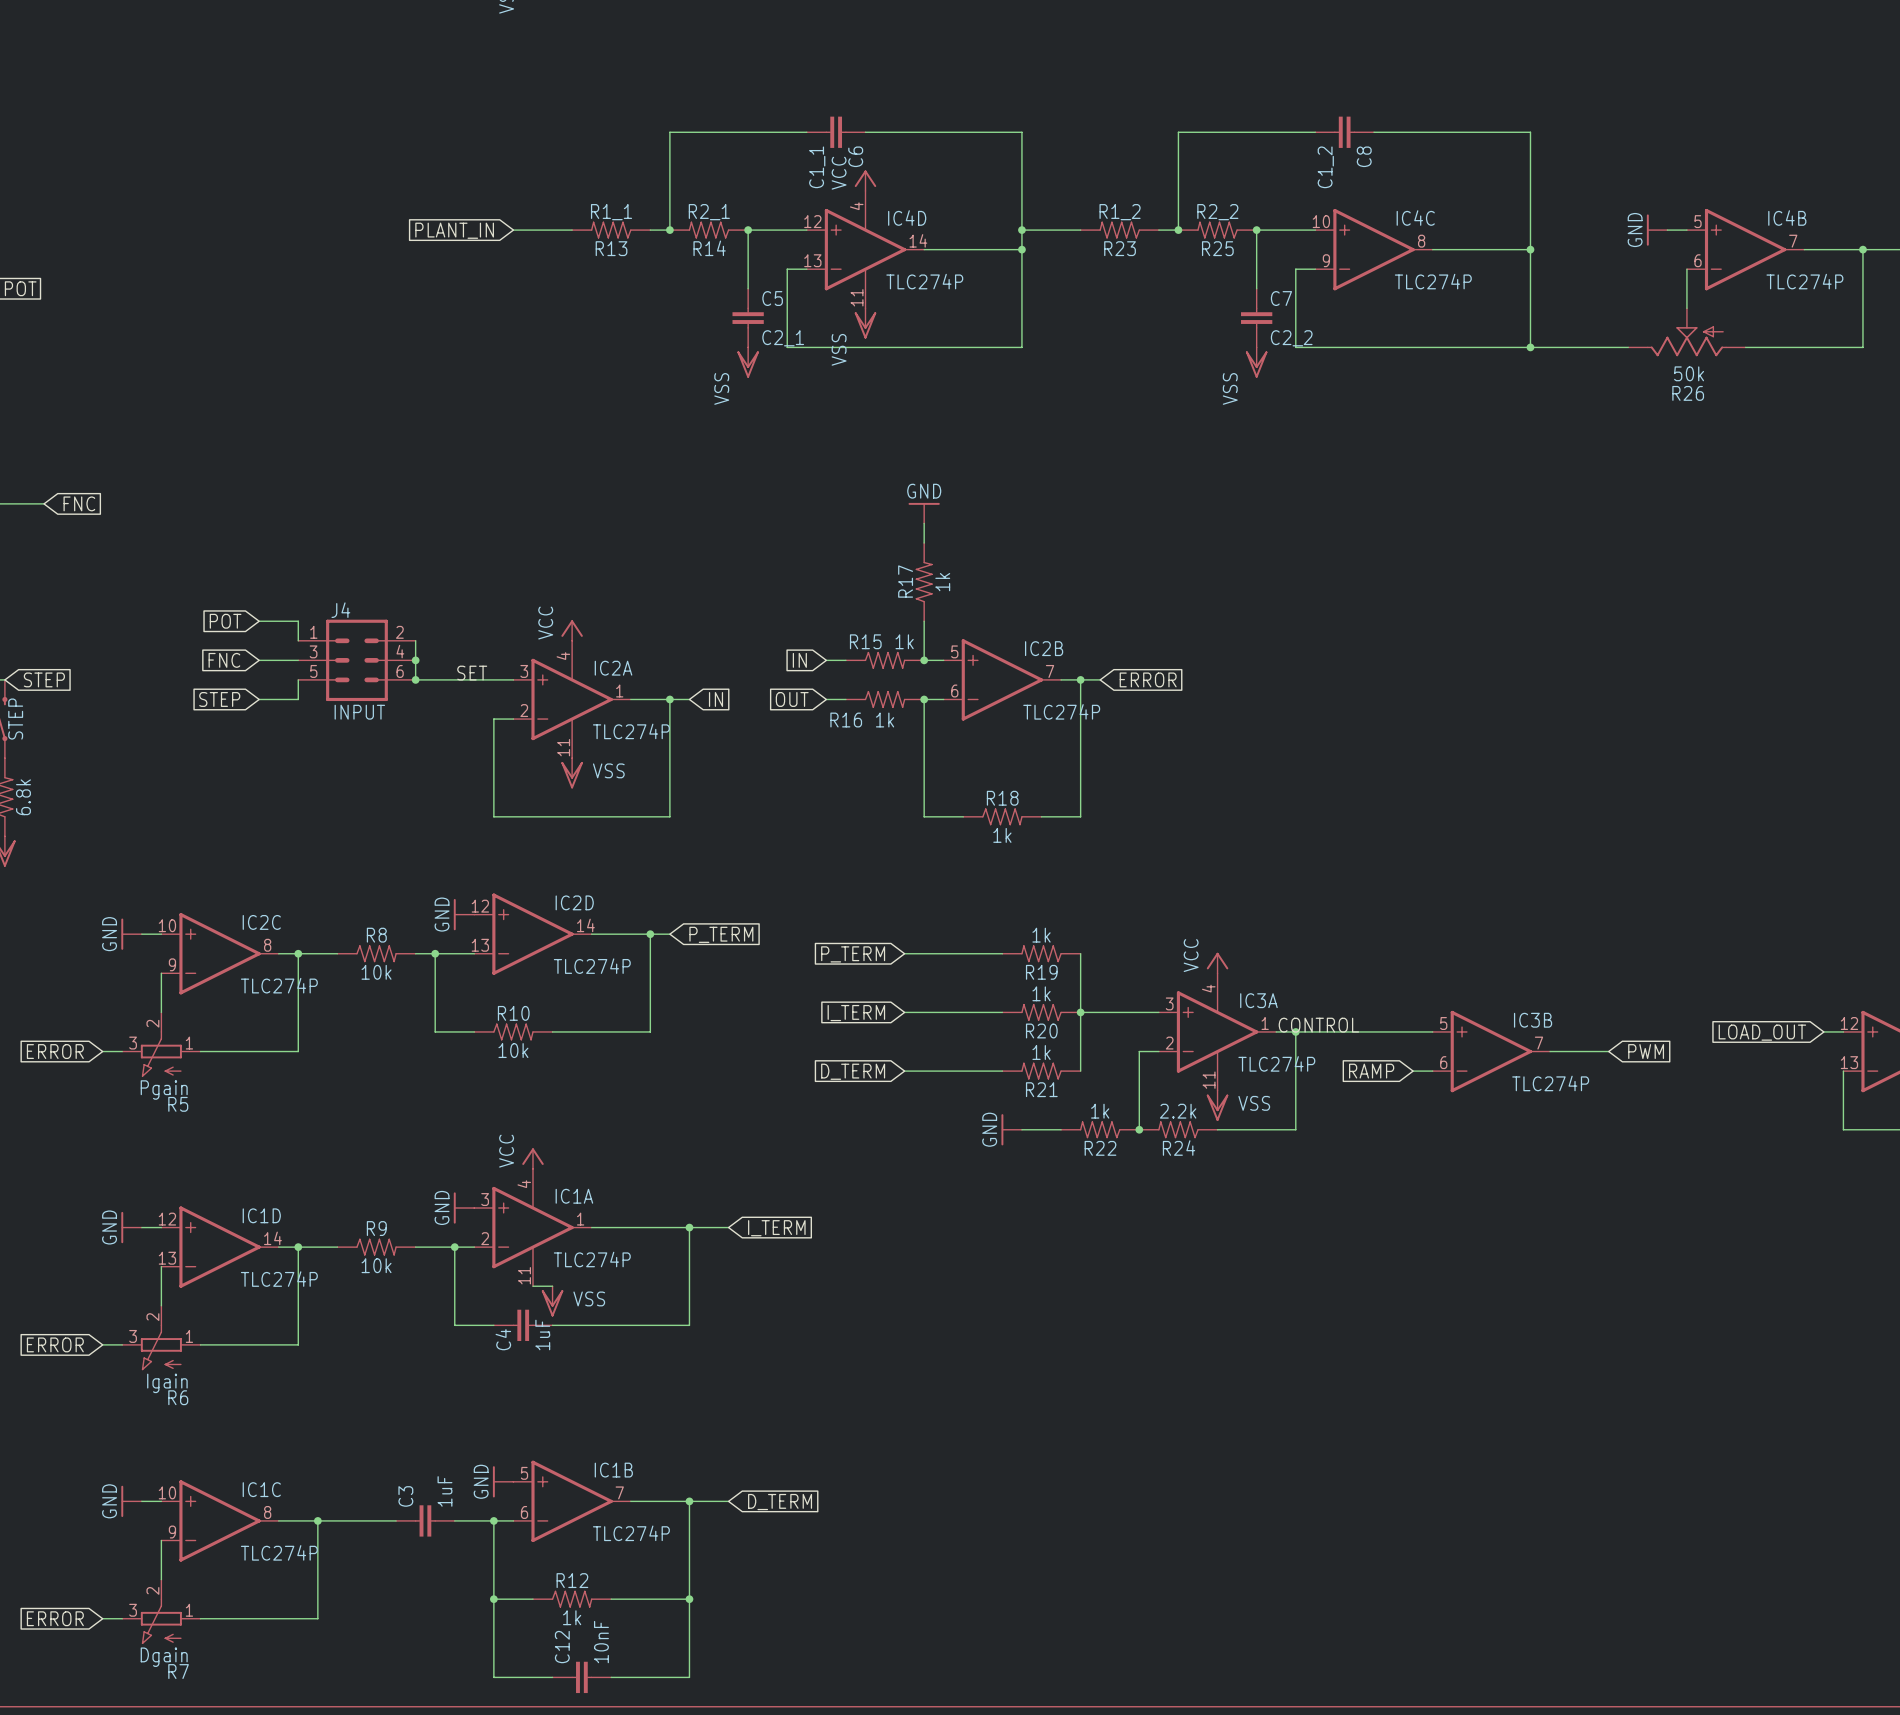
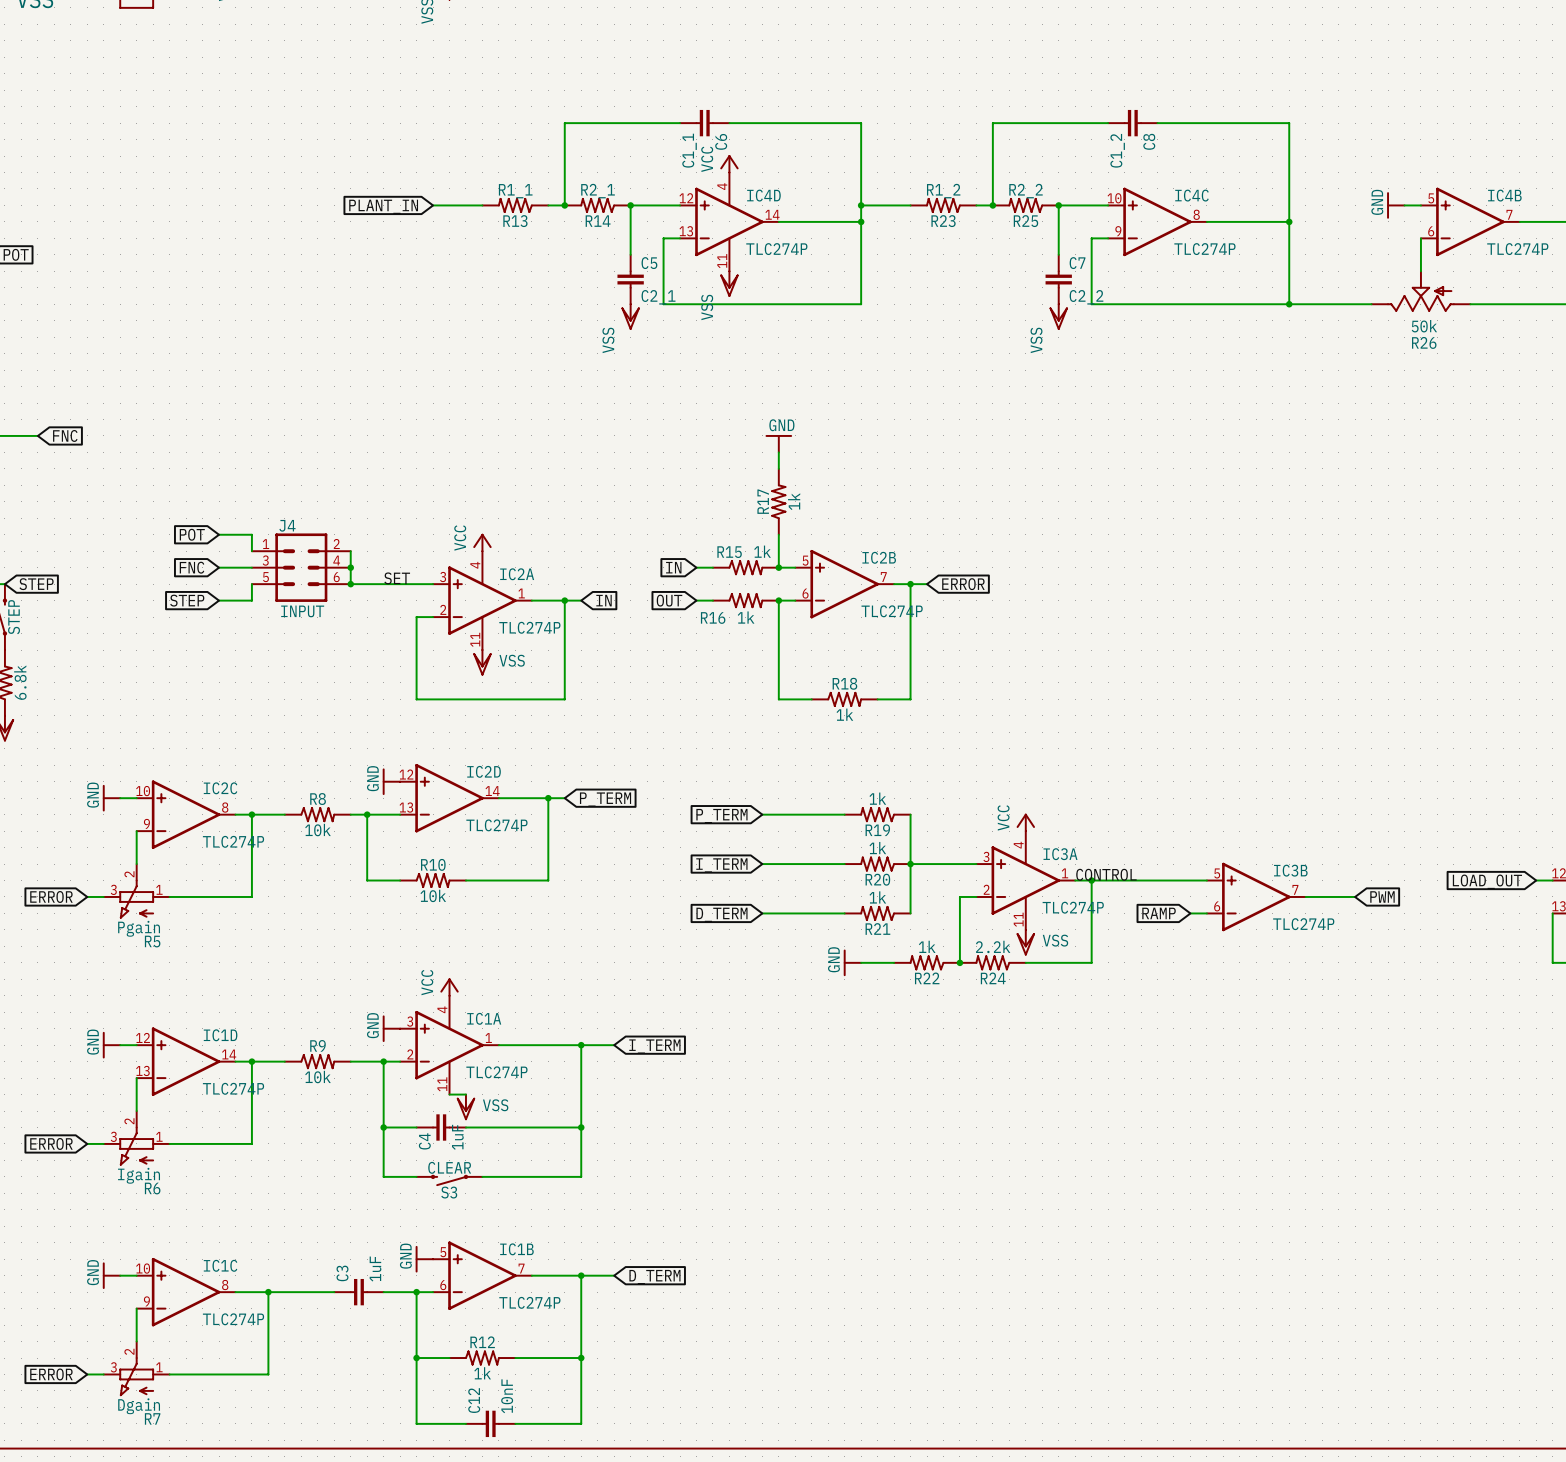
wire: none -> (383, 1127) (383, 1176) (416, 1176)
junction: none -> (383, 1127)
wire: none -> (581, 1127) (581, 1176) (482, 1176)
junction: none -> (581, 1127)
S3: none -> CLEAR (449, 1180)

